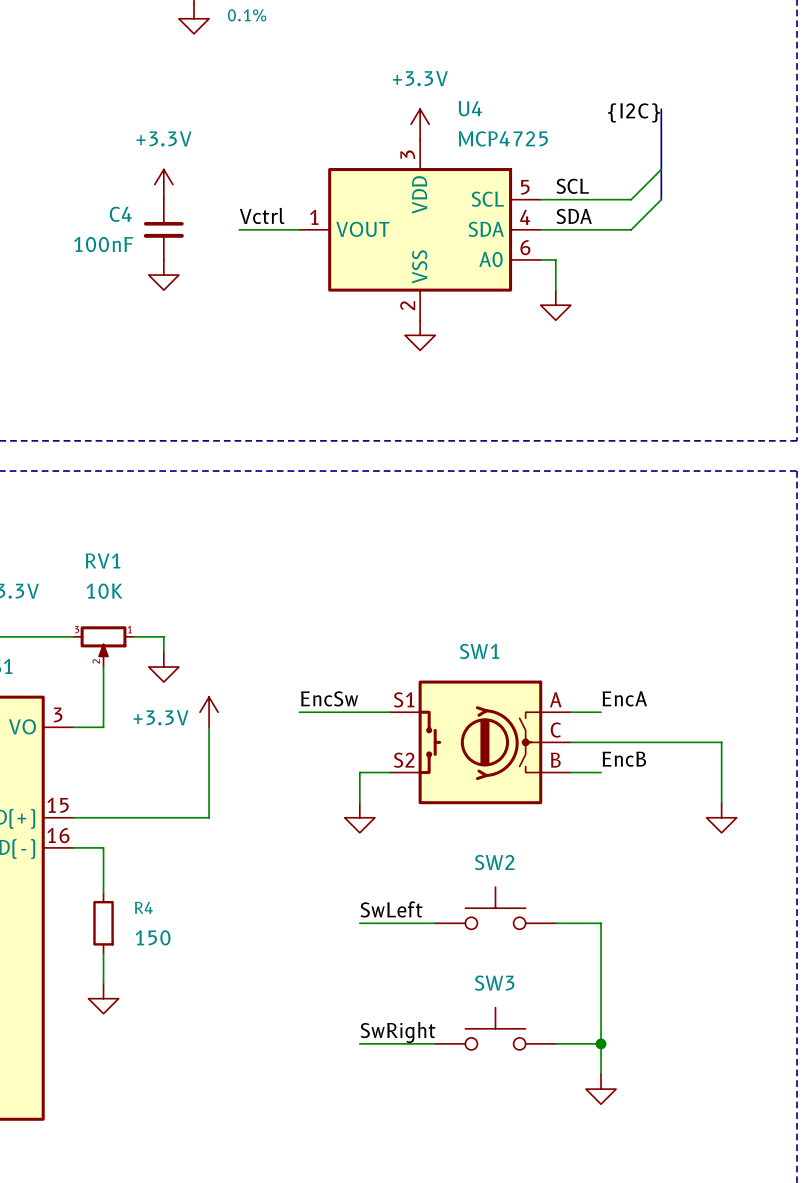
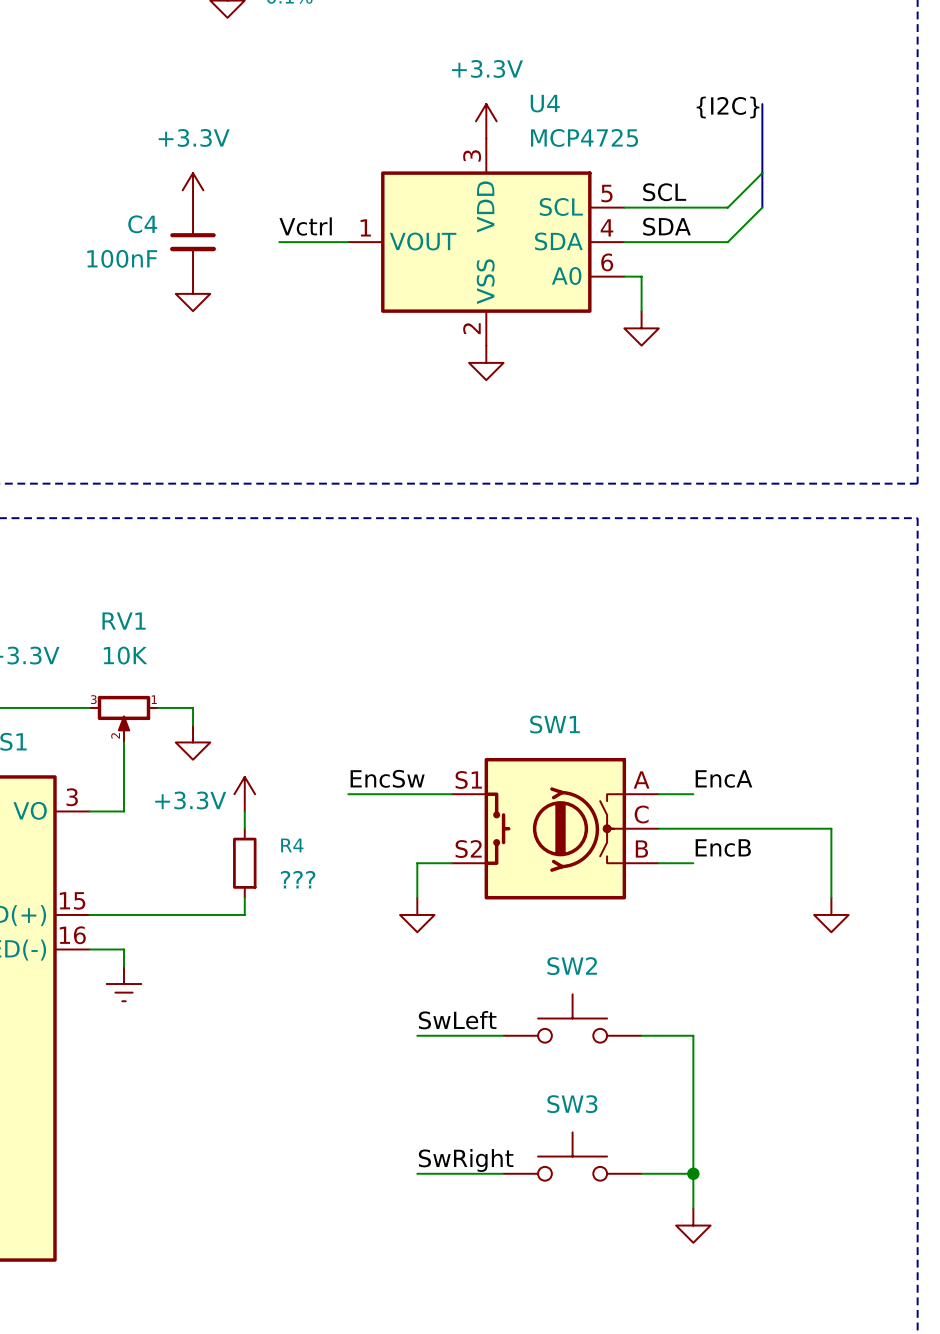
wire: (209, 742) (209, 802) -> none
power symbol: none -> (124, 984)
R4 position: (103, 923) -> (244, 863)
R4 value: 150 (153, 937) -> ??? (298, 879)
wire: (103, 953) (103, 983) -> none
power symbol: (103, 998) -> none

